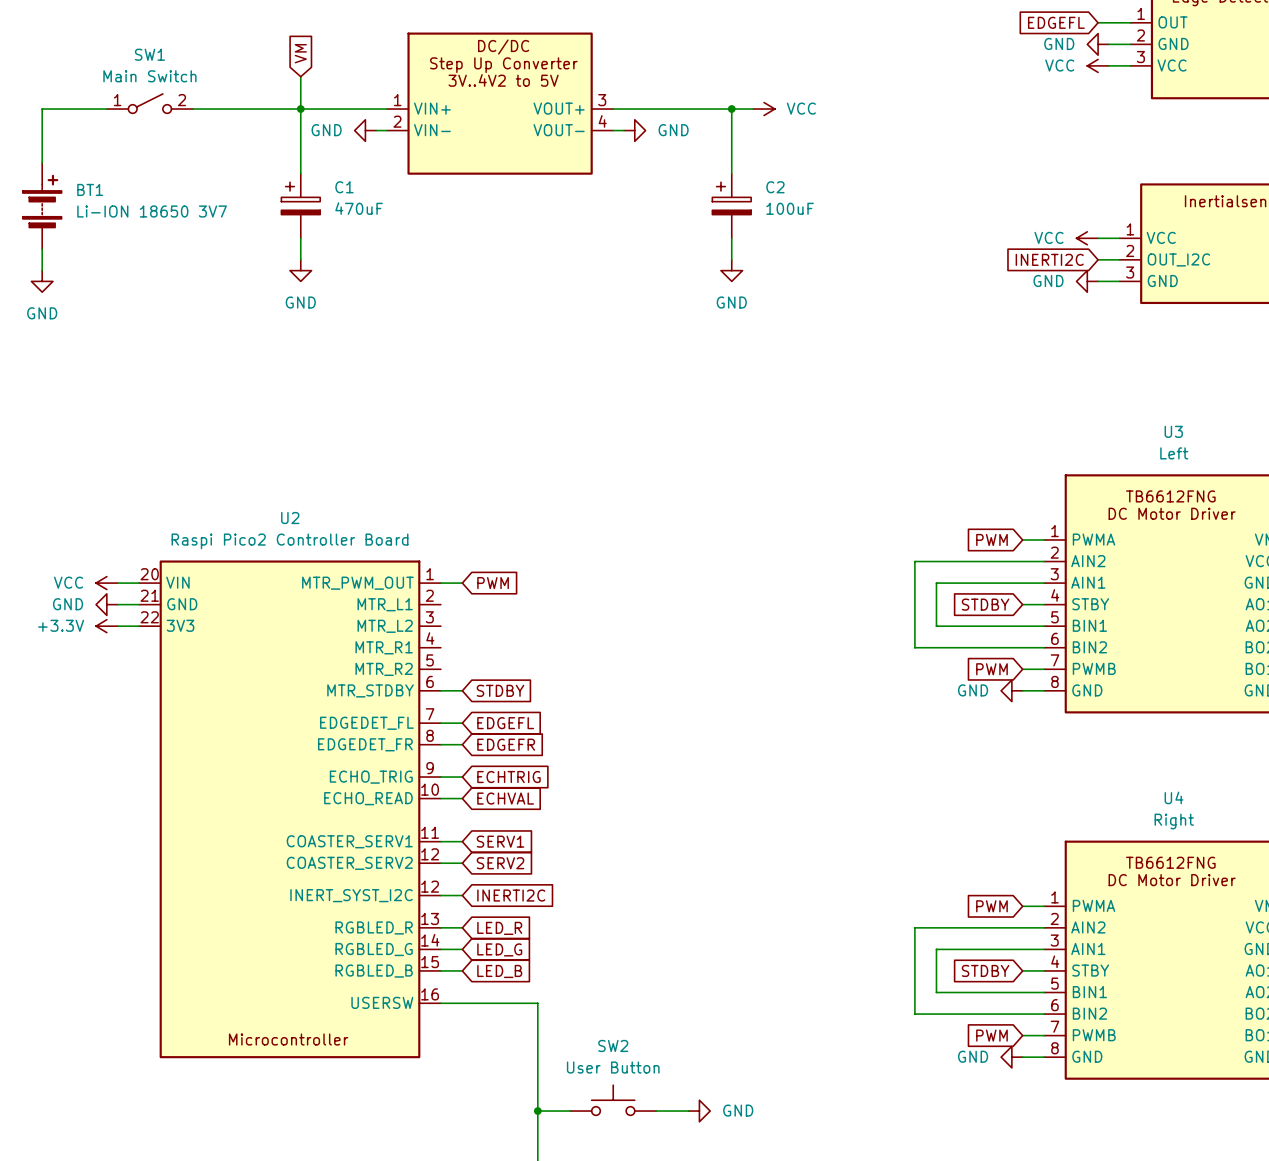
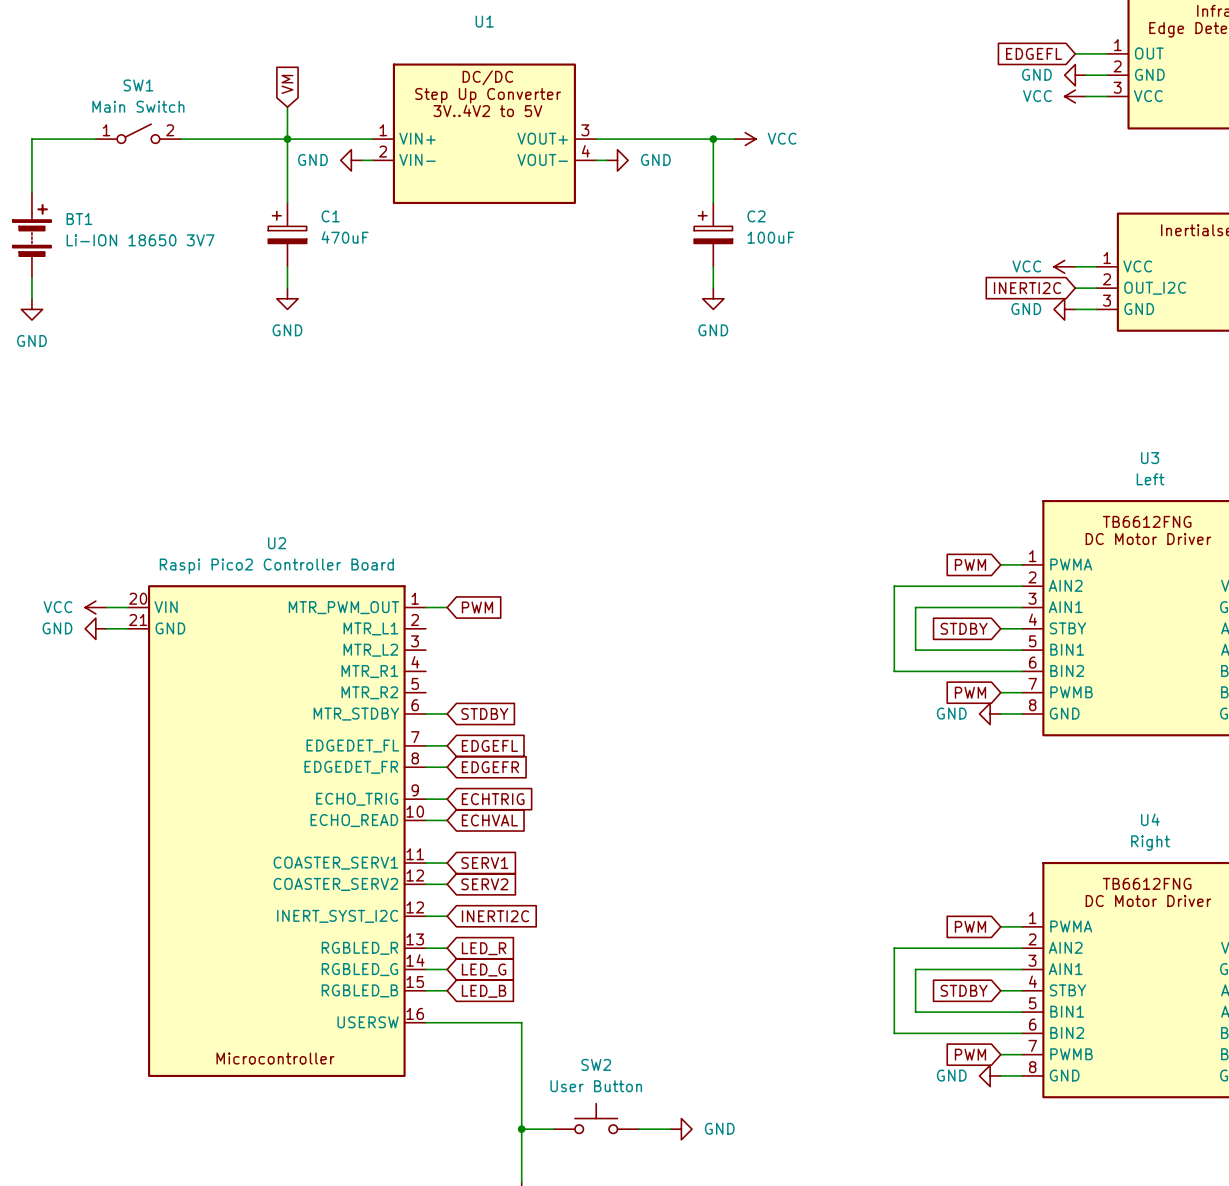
U2 symbol: [139, 560, 441, 1059] -> [127, 585, 426, 1078]
power symbol: +3.3V (106, 626) -> none
wire: (117, 626) (139, 626) -> none

